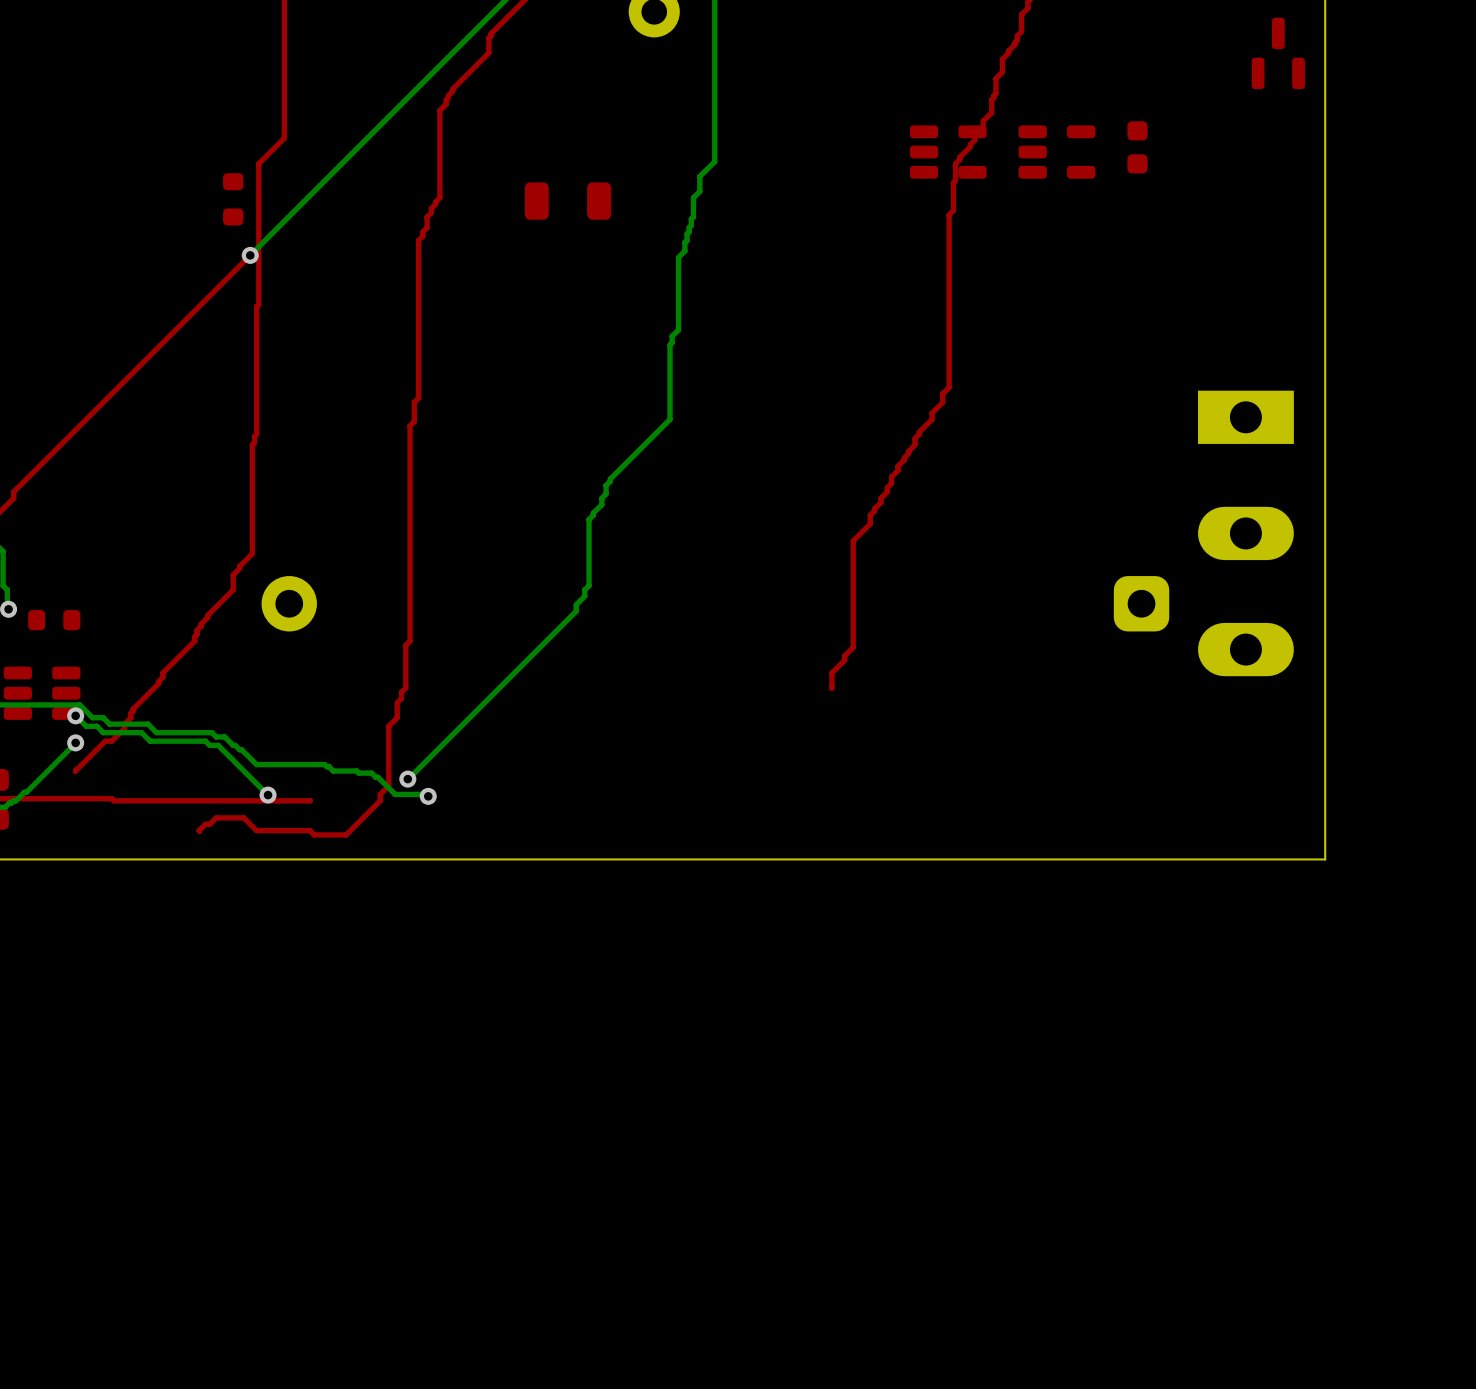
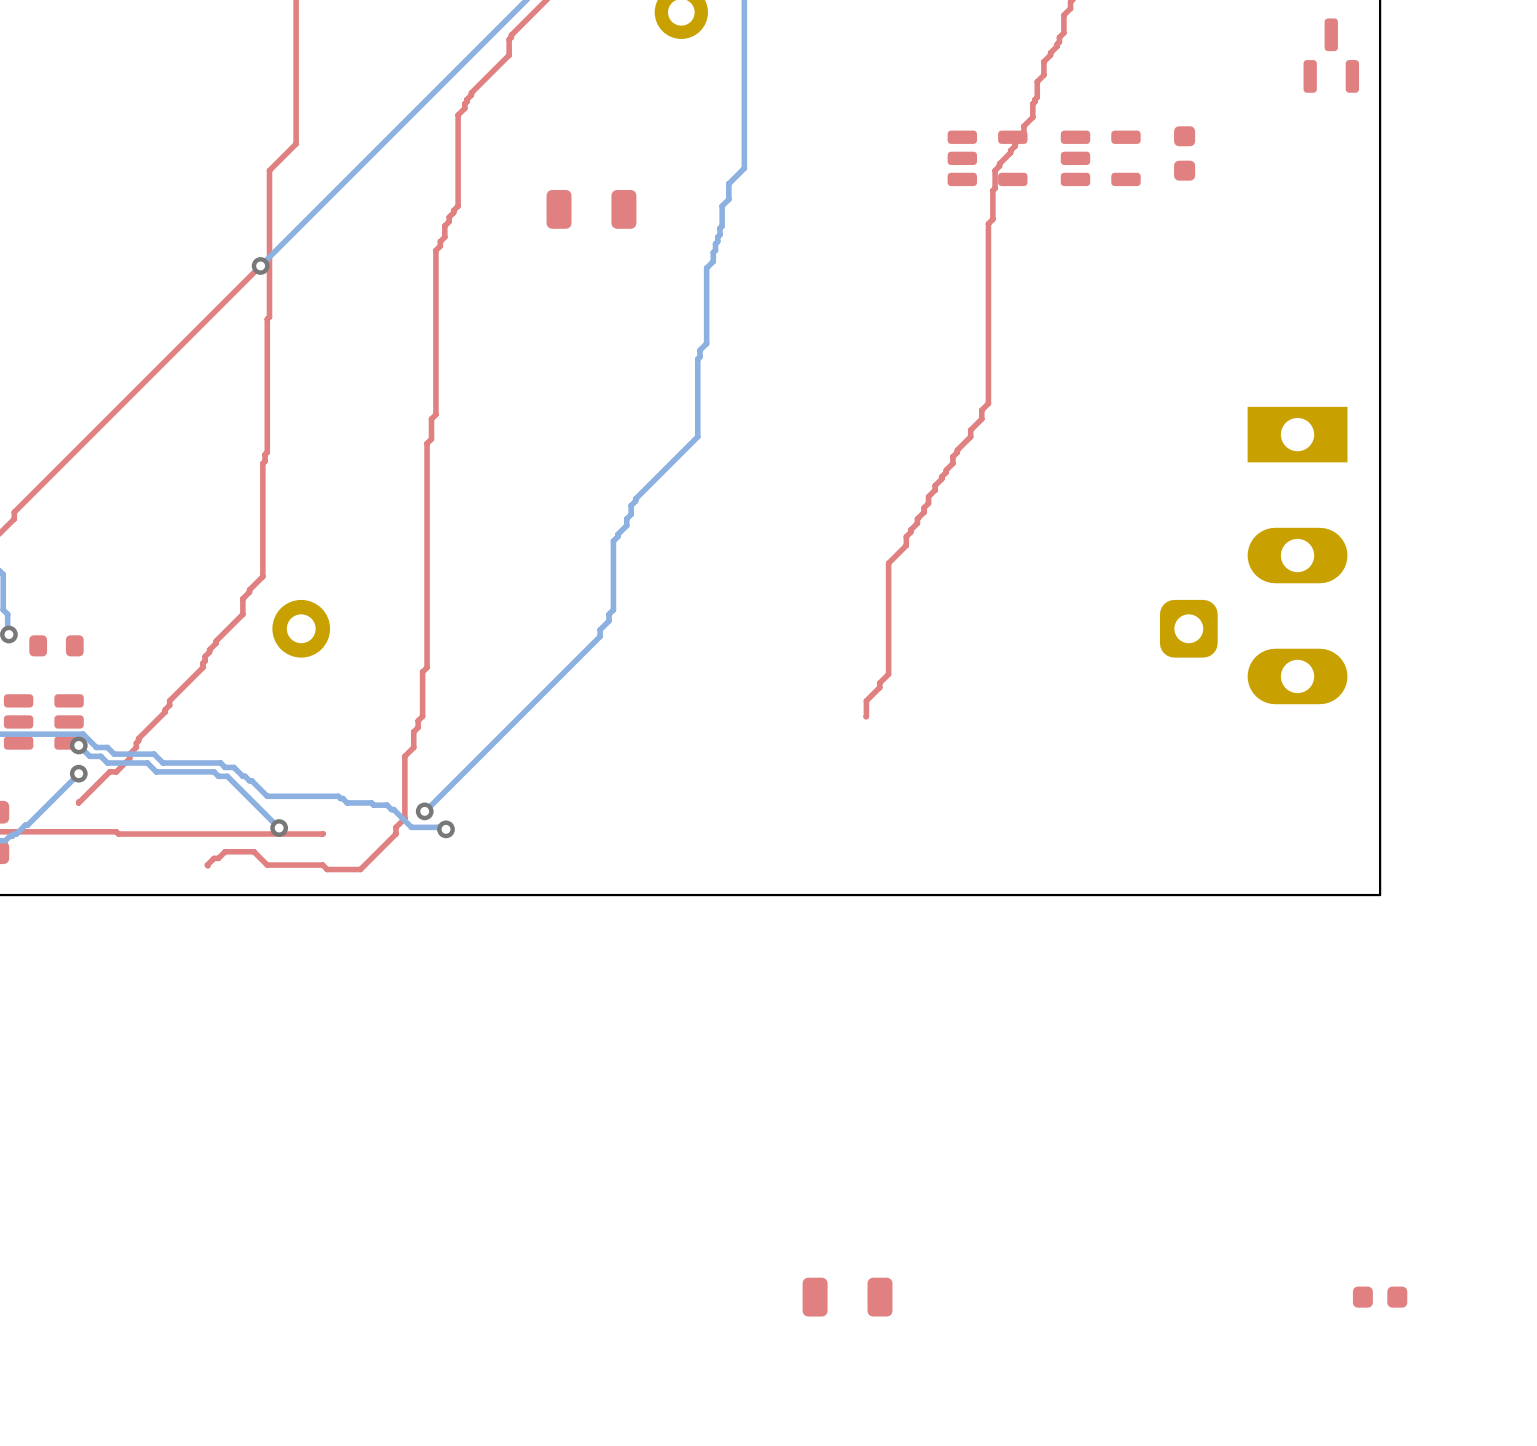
part: (233, 199) -> none
part: none -> (847, 1297)
part: none -> (1380, 1297)

